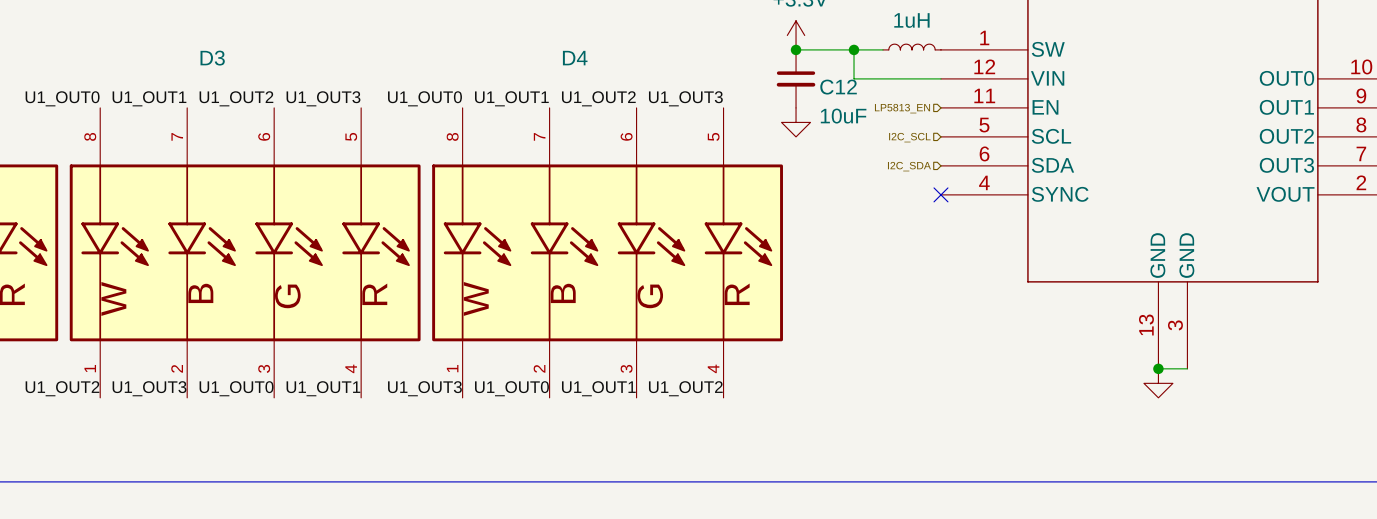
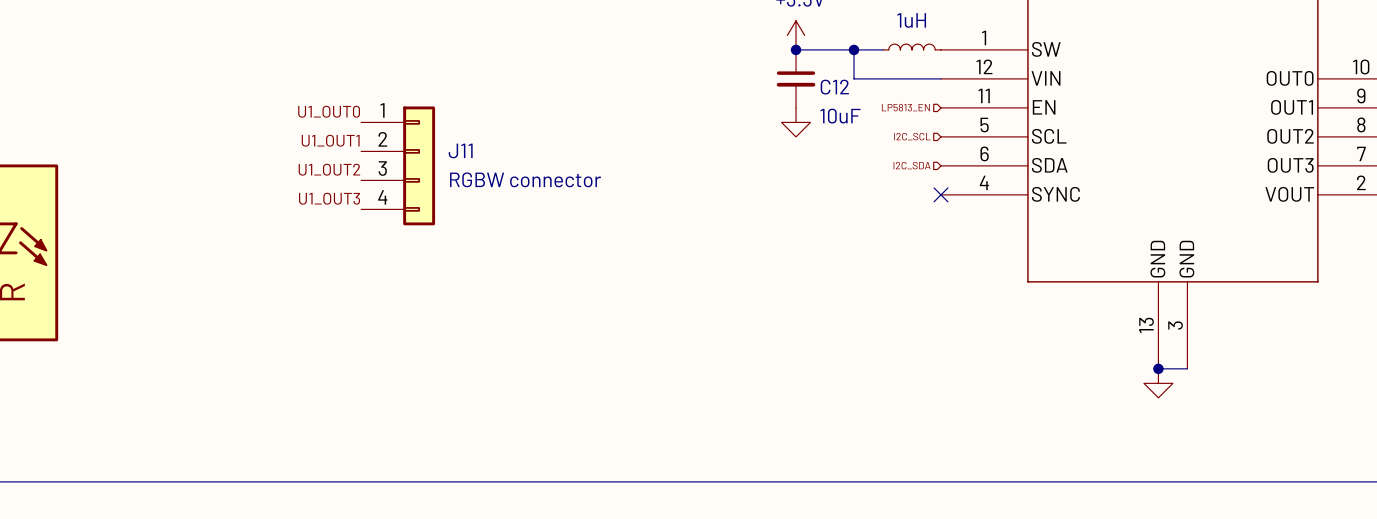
label: U1_OUT0 (62, 98) -> none
label: U1_OUT1 (149, 98) -> none
label position: U1_OUT2 (236, 98) -> U1_OUT2 (329, 169)
label position: U1_OUT3 (323, 98) -> U1_OUT3 (329, 198)
label position: U1_OUT0 (424, 98) -> U1_OUT0 (329, 111)
label: U1_OUT1 (511, 98) -> none
label: U1_OUT2 (598, 98) -> none
label: U1_OUT3 (685, 98) -> none
label: none -> U1_OUT1 (330, 140)
J11: none -> RGBW connector (398, 165)
D3: (245, 252) -> none
D4: (607, 252) -> none
label: U1_OUT2 (62, 388) -> none
label: U1_OUT3 (149, 388) -> none
label: U1_OUT0 (236, 388) -> none
label: U1_OUT1 (323, 388) -> none
label: U1_OUT3 (424, 388) -> none
label: U1_OUT0 (511, 388) -> none
label: U1_OUT1 (598, 388) -> none
label: U1_OUT2 (685, 388) -> none

